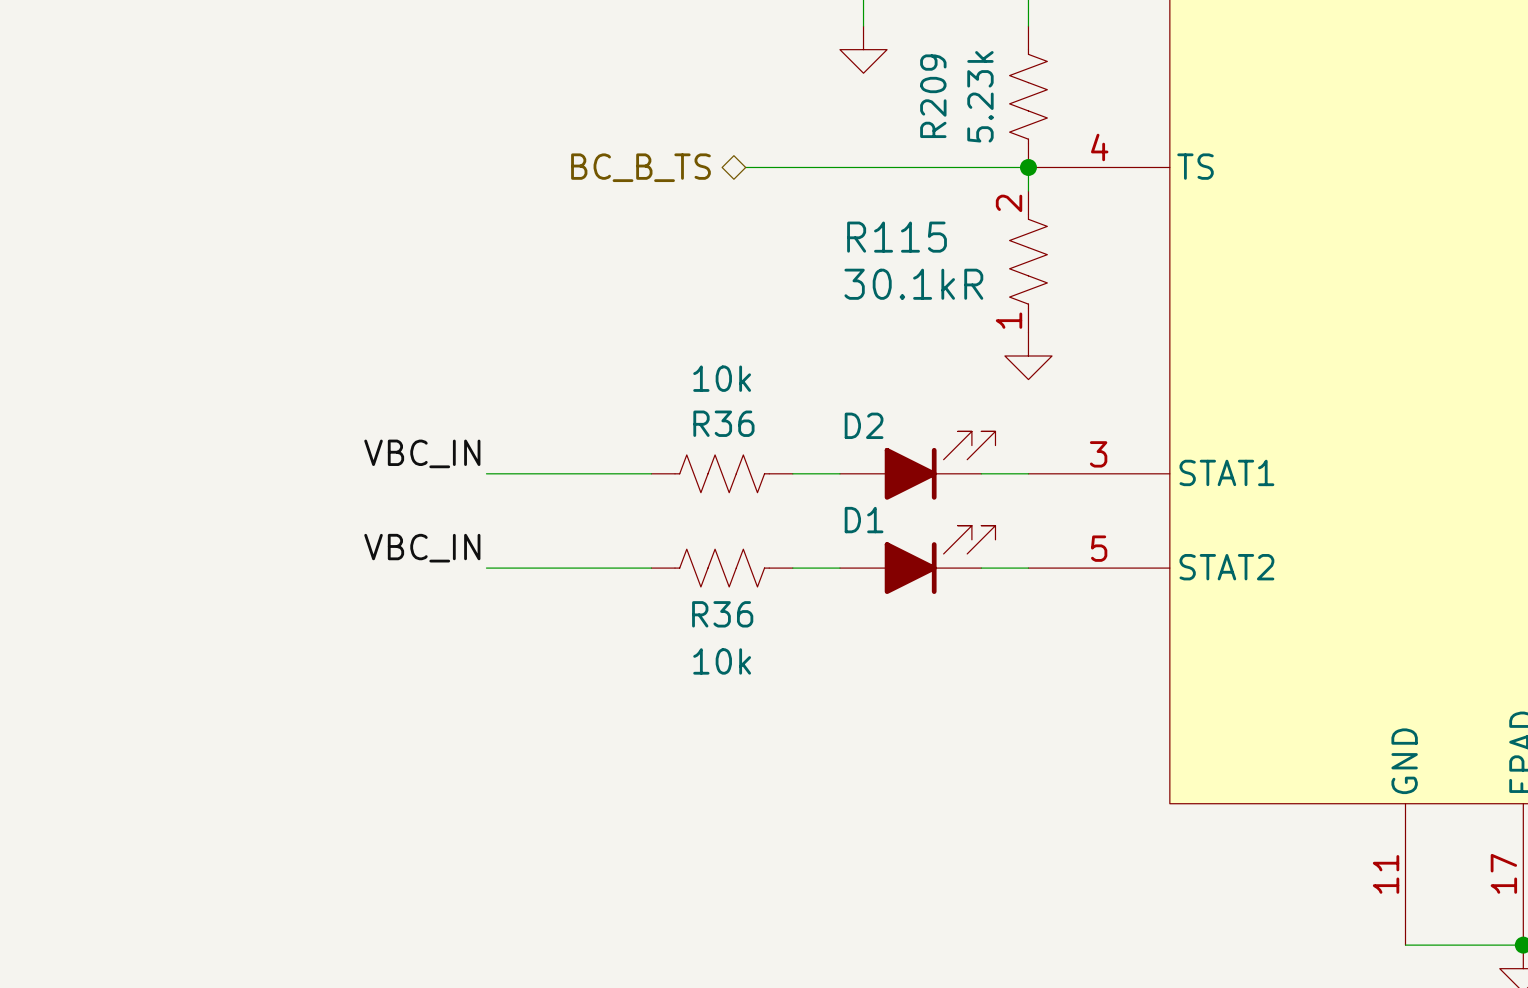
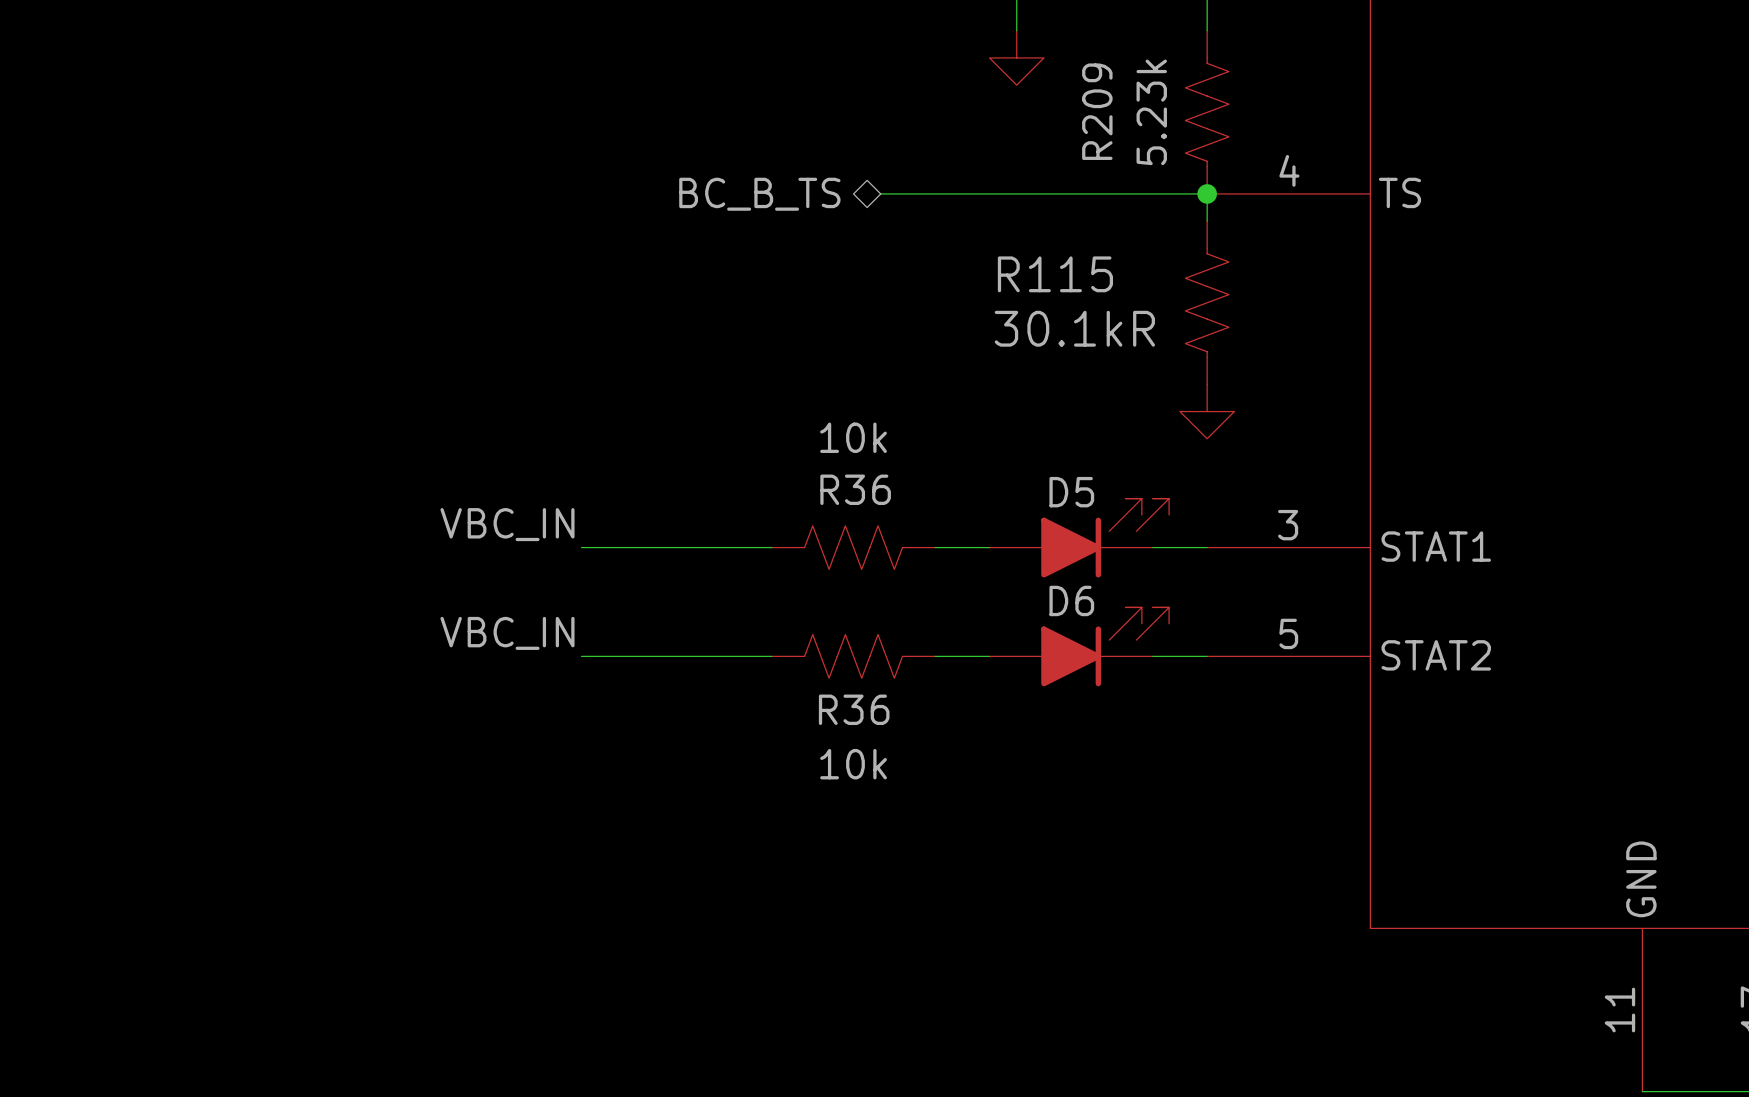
R115 pin number: 2 (1009, 203) -> none
R115 pin number: 1 (1009, 320) -> none
D2 name: D2 (864, 425) -> D5 (1071, 492)
D1 name: D1 (864, 520) -> D6 (1071, 600)

